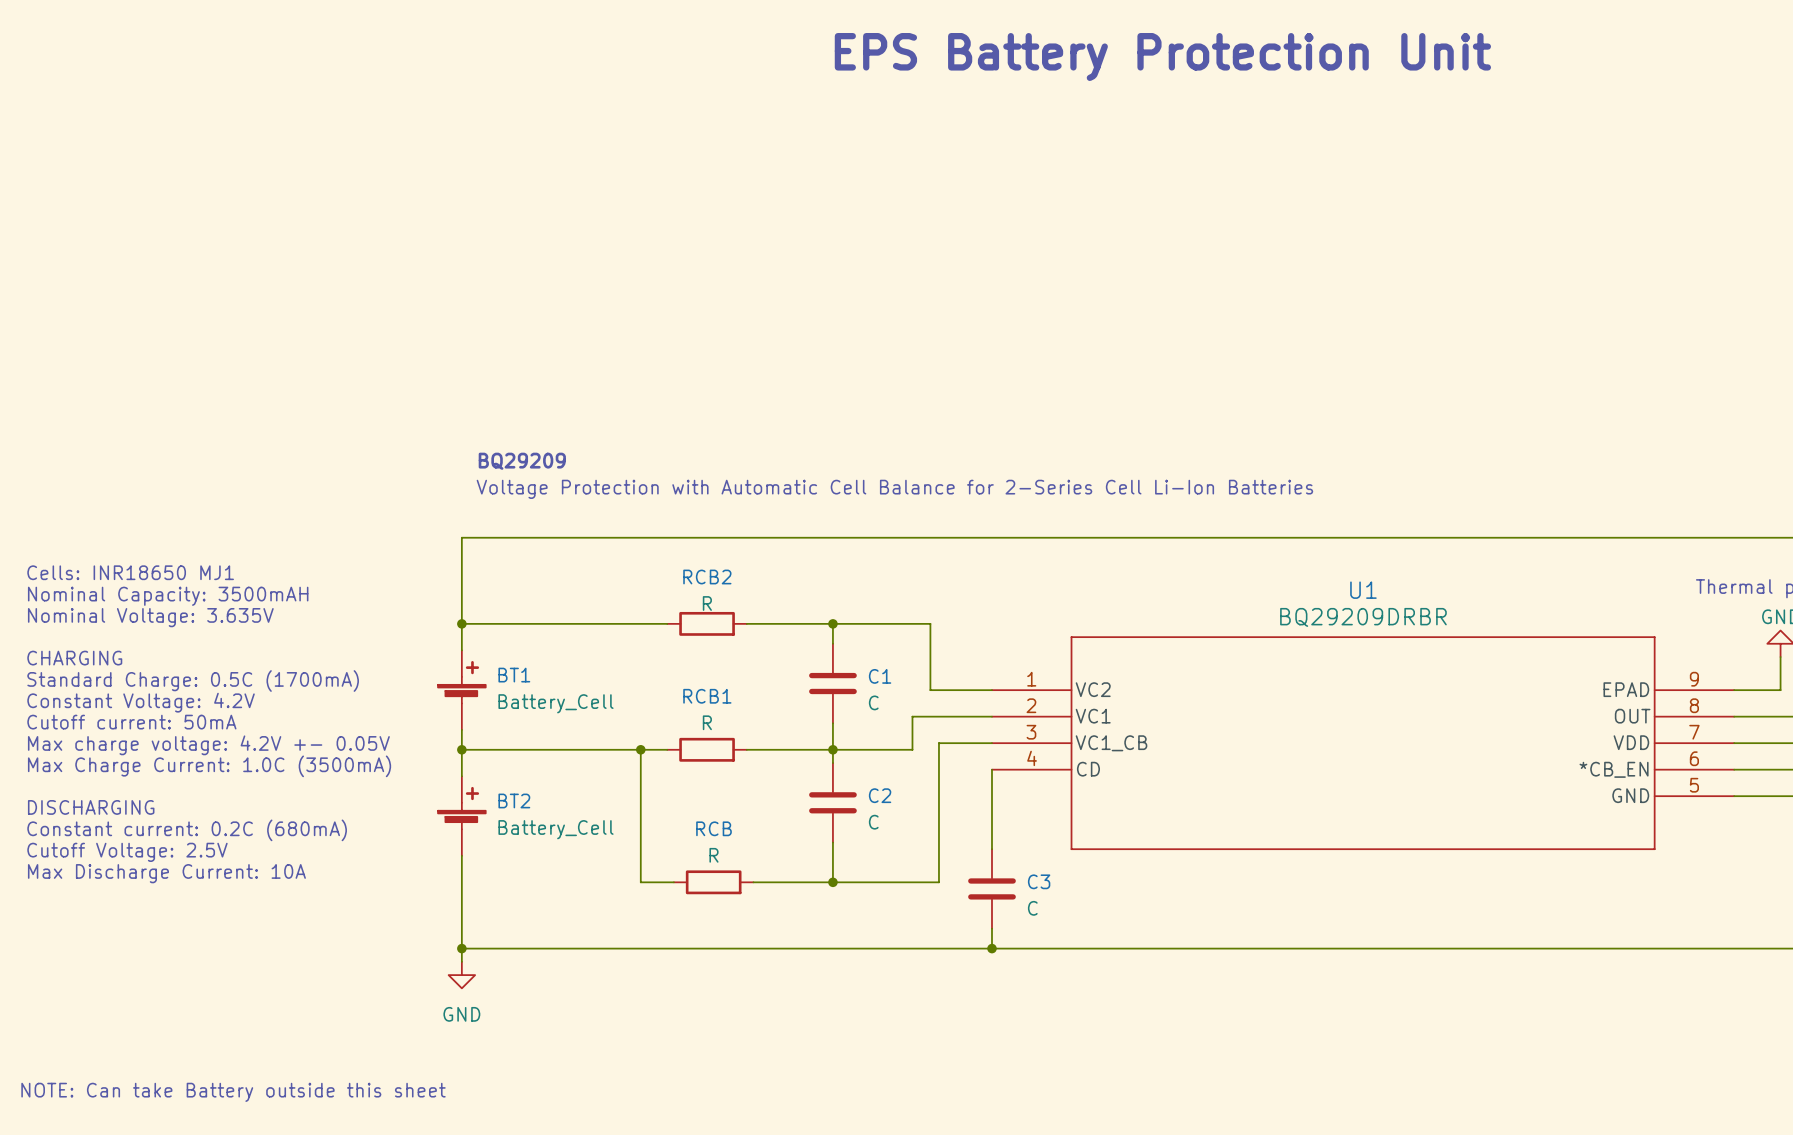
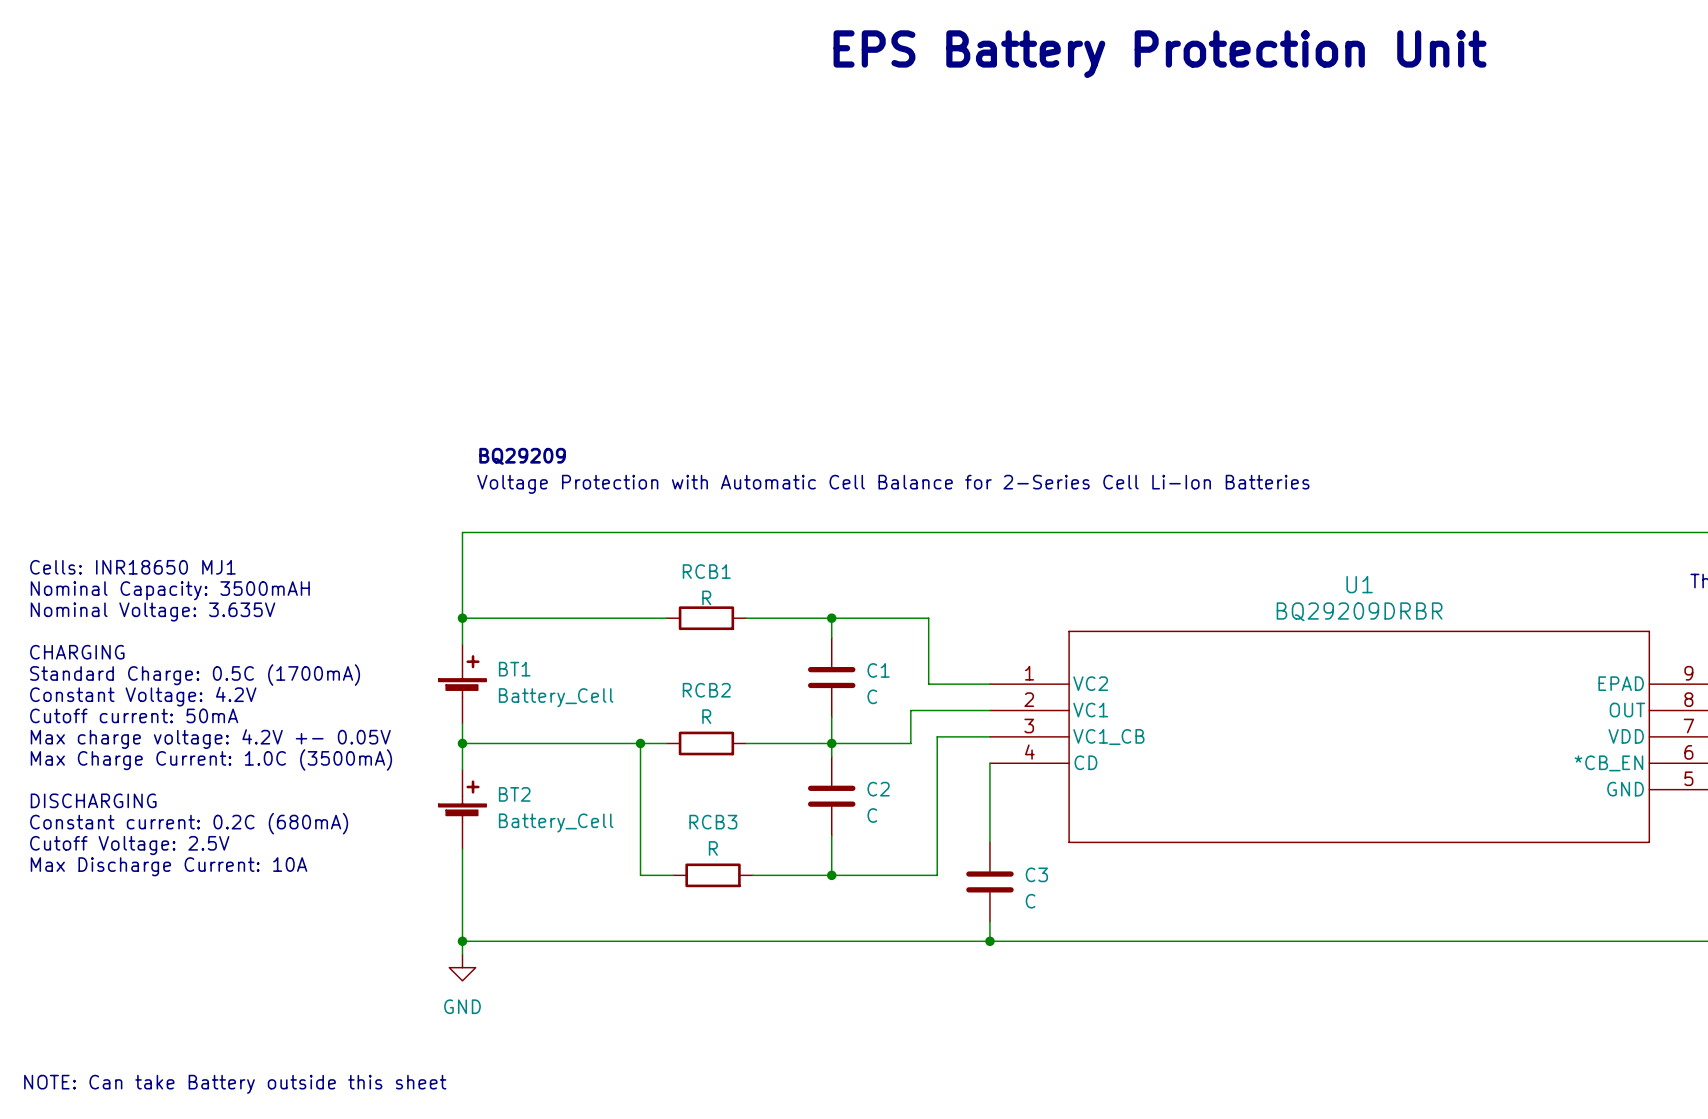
RCB2 name: RCB2 (707, 577) -> RCB1 (706, 571)
RCB1 name: RCB1 (707, 696) -> RCB2 (706, 690)
RCB name: RCB (713, 828) -> RCB3 (713, 822)

